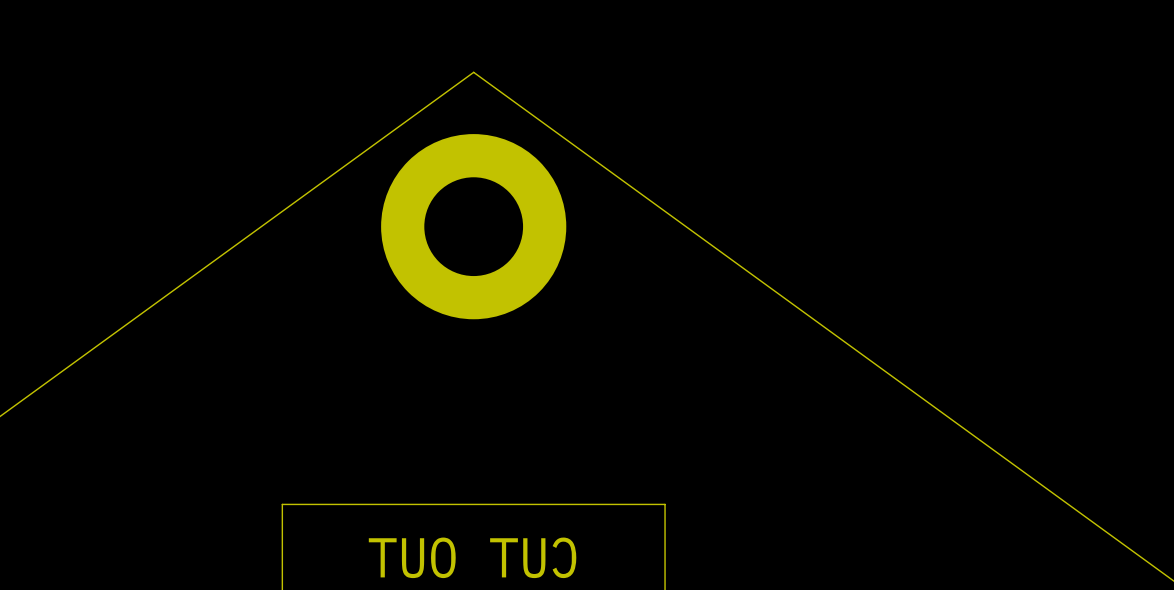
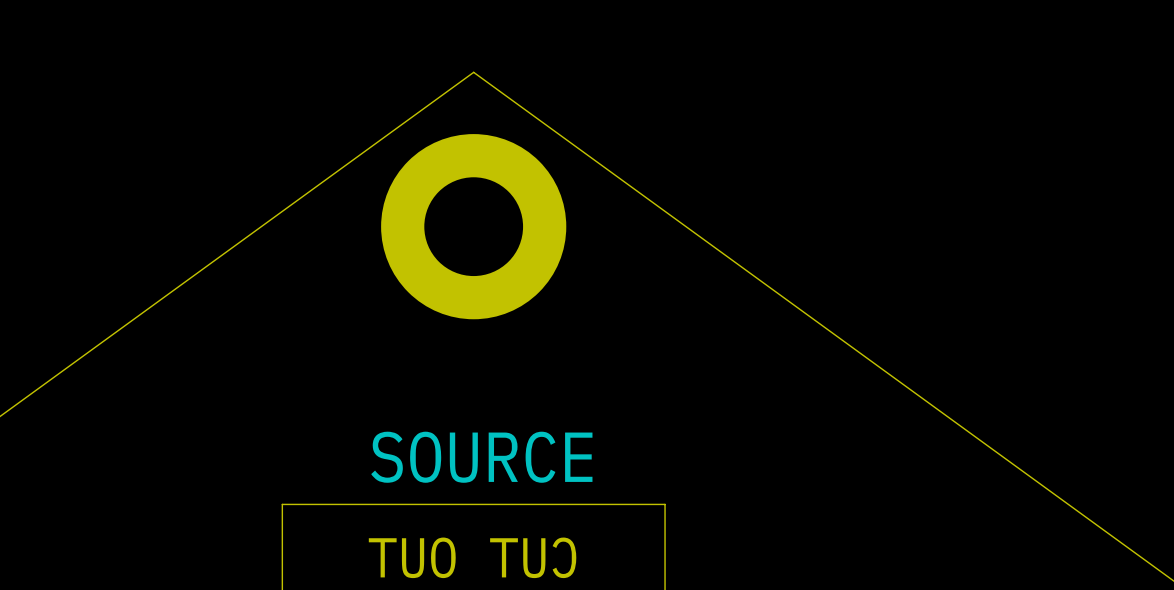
SOURCE name: none -> SOURCE (481, 457)

